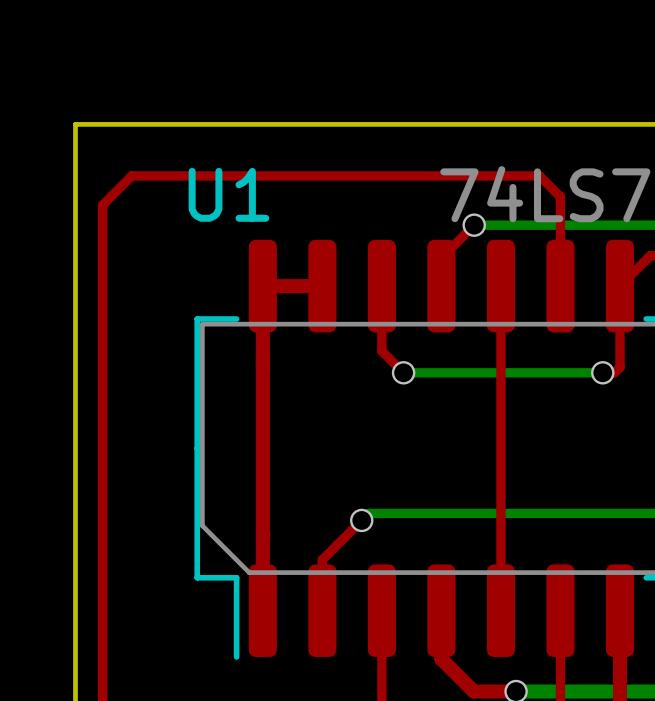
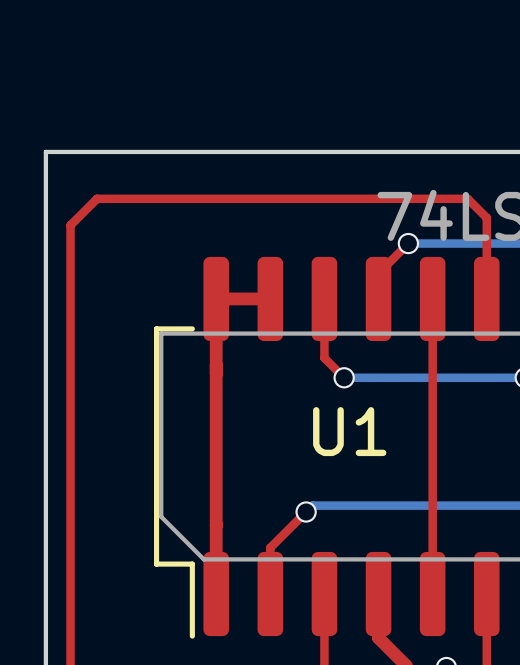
U1 name position: U1 (228, 194) -> U1 (349, 431)

